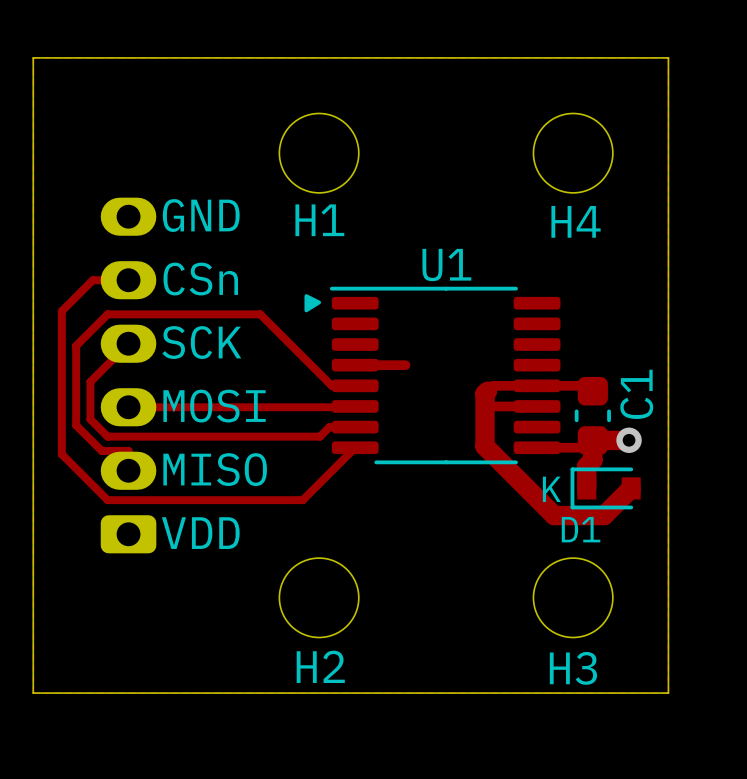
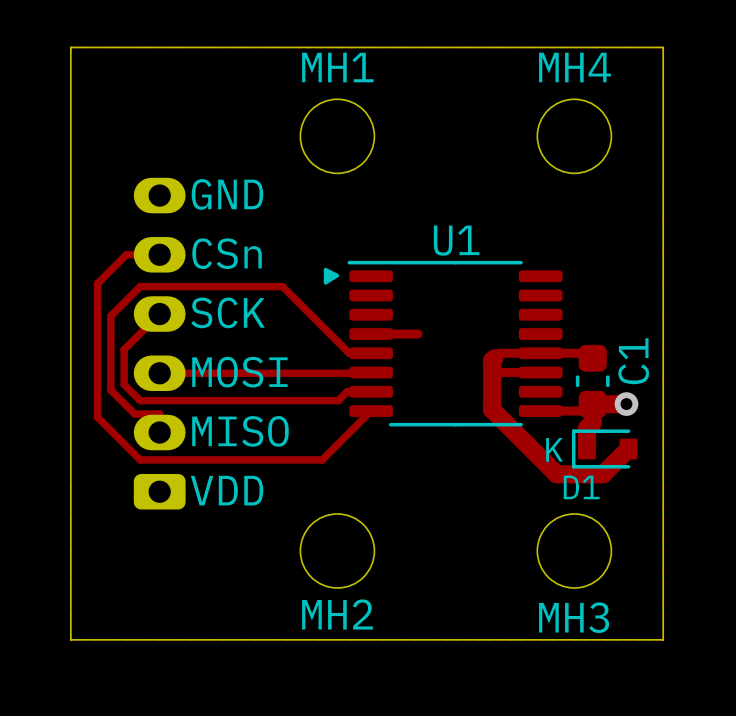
H1 name: H1 (319, 220) -> MH1 (337, 67)
H4 name: H4 (576, 221) -> MH4 (575, 67)
H2 name: H2 (320, 666) -> MH2 (337, 614)
H3 name: H3 (573, 668) -> MH3 (574, 617)

